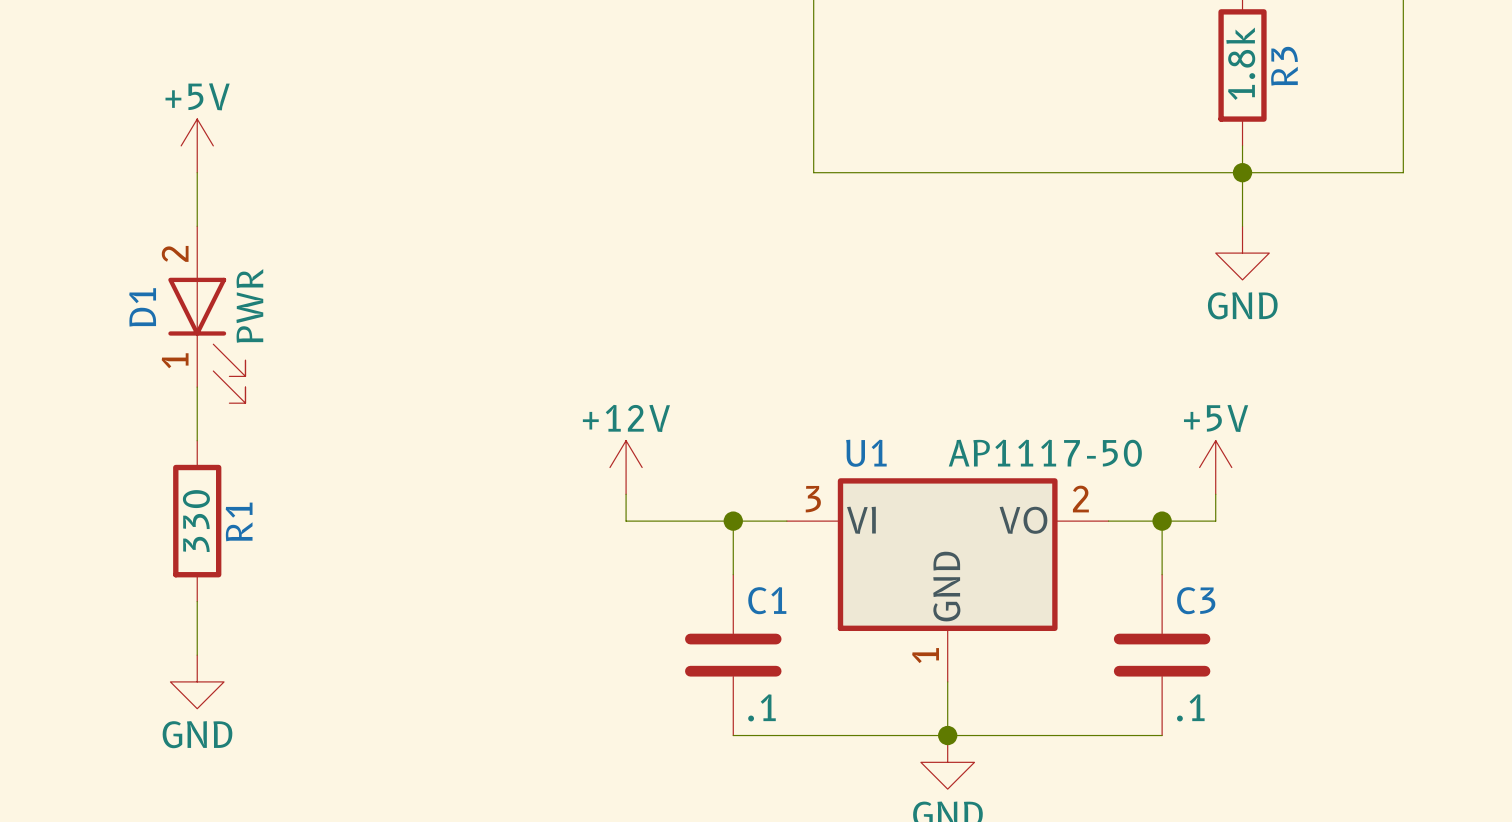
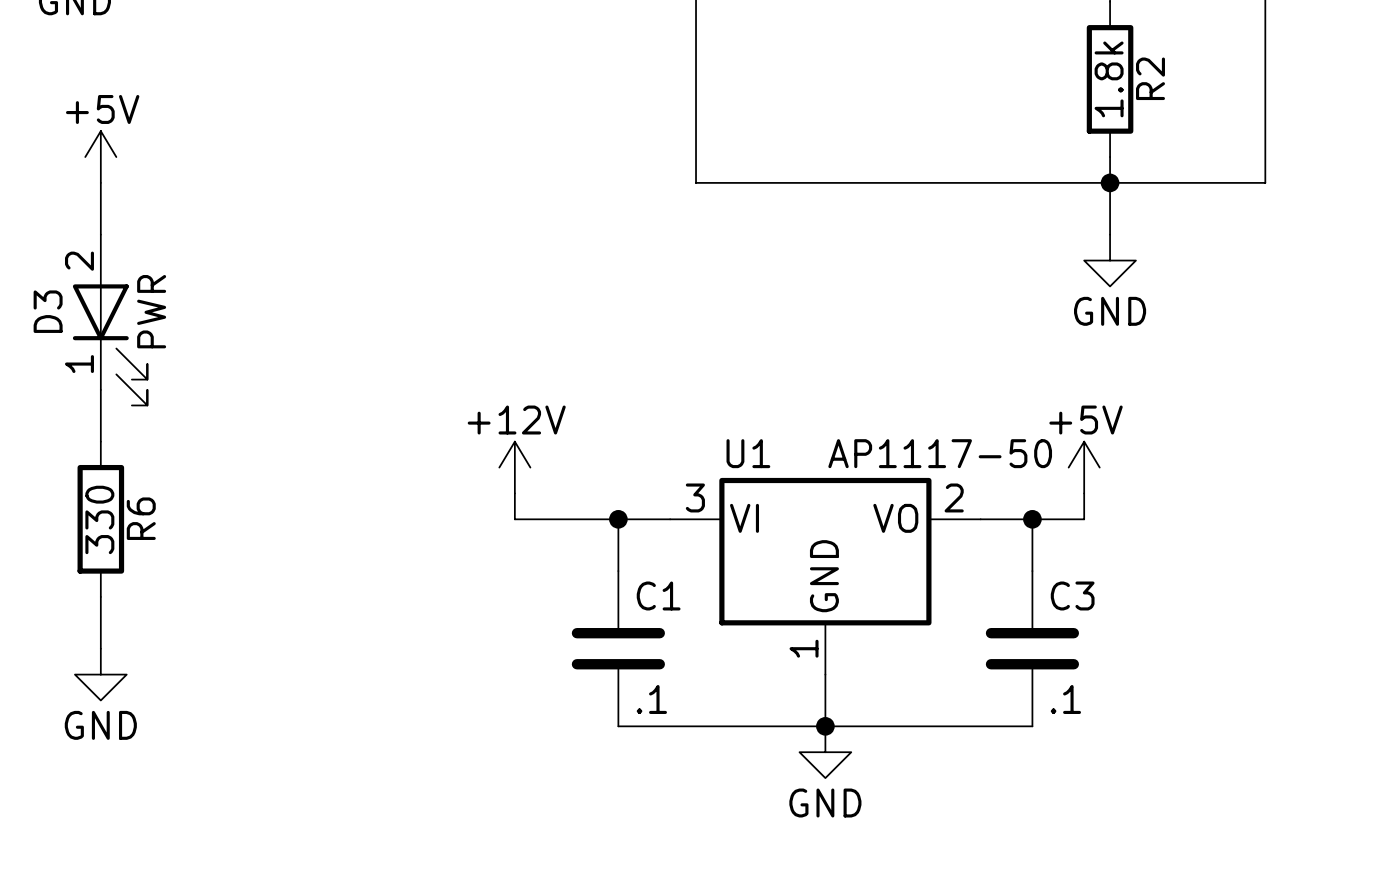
R3 name: R3 (1284, 66) -> R2 (1150, 78)
D1 name: D1 (142, 307) -> D3 (48, 311)
R1 name: R1 (239, 521) -> R6 (141, 518)

